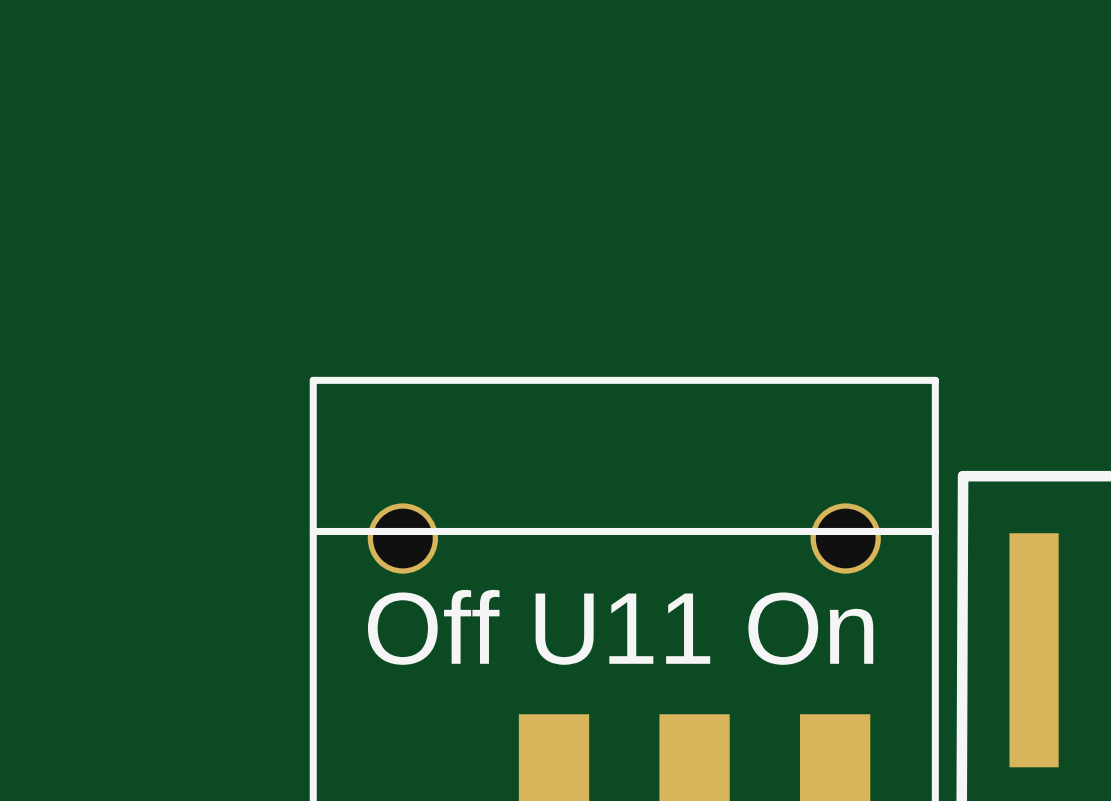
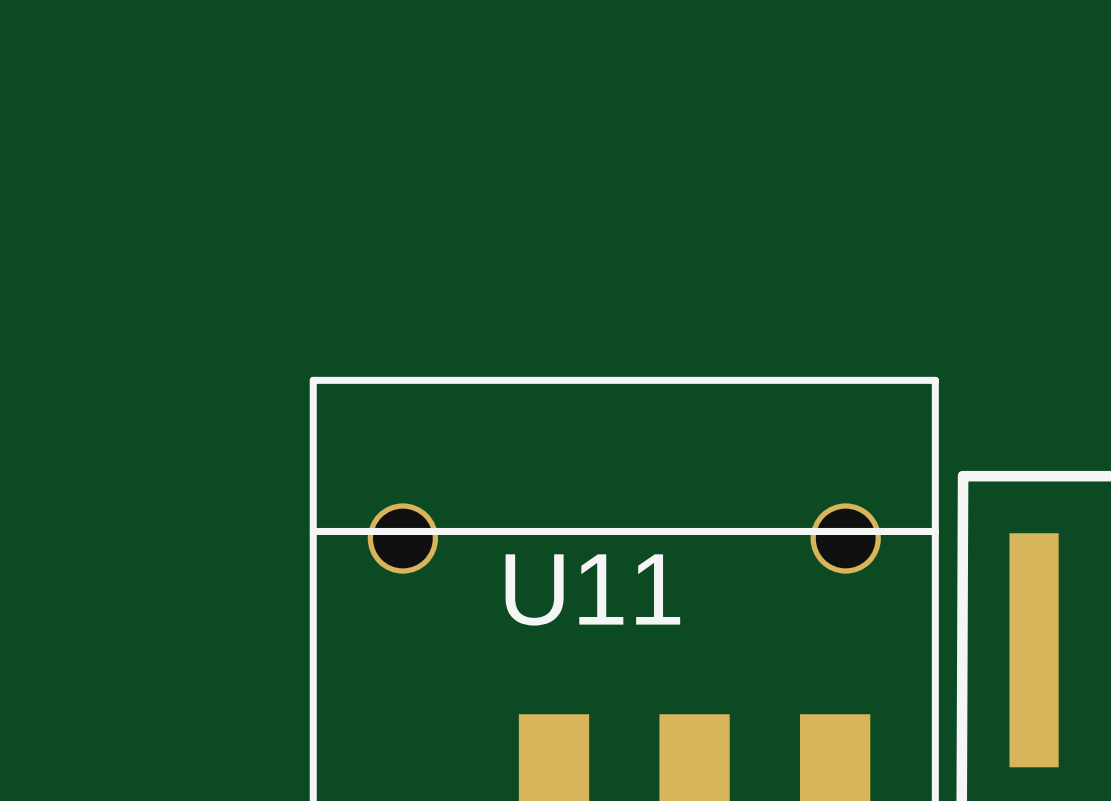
Off U11 On name: Off U11 On (620, 627) -> U11 (592, 589)

